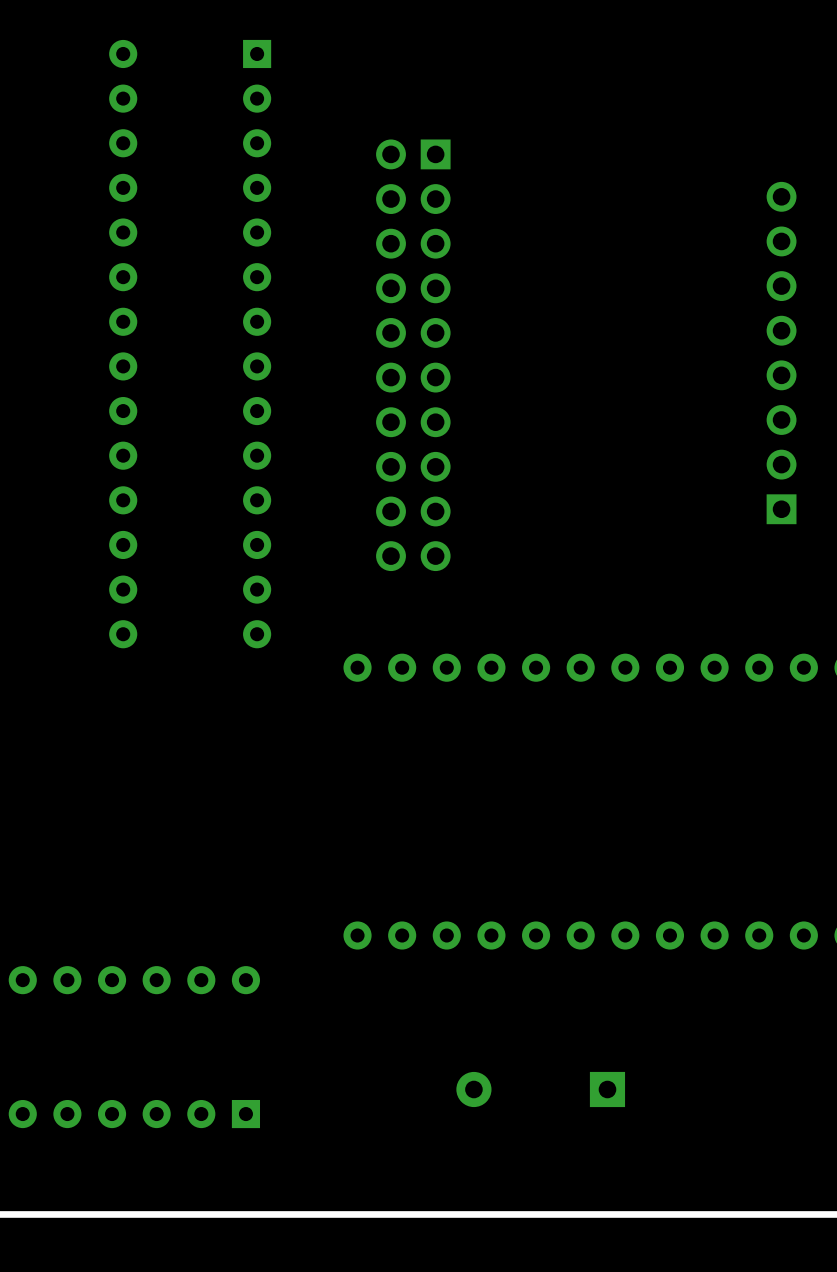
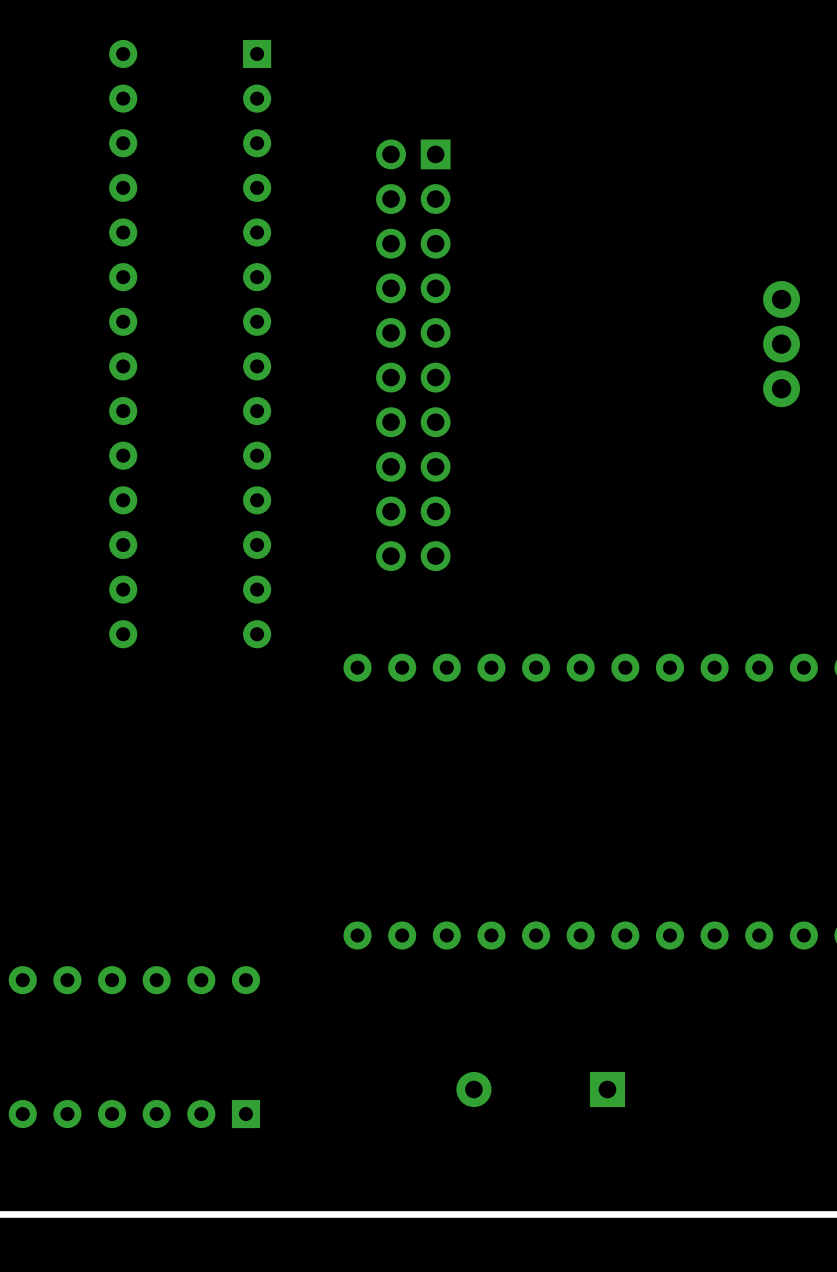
part footprint: [766, 181, 797, 525] -> [763, 281, 801, 408]

